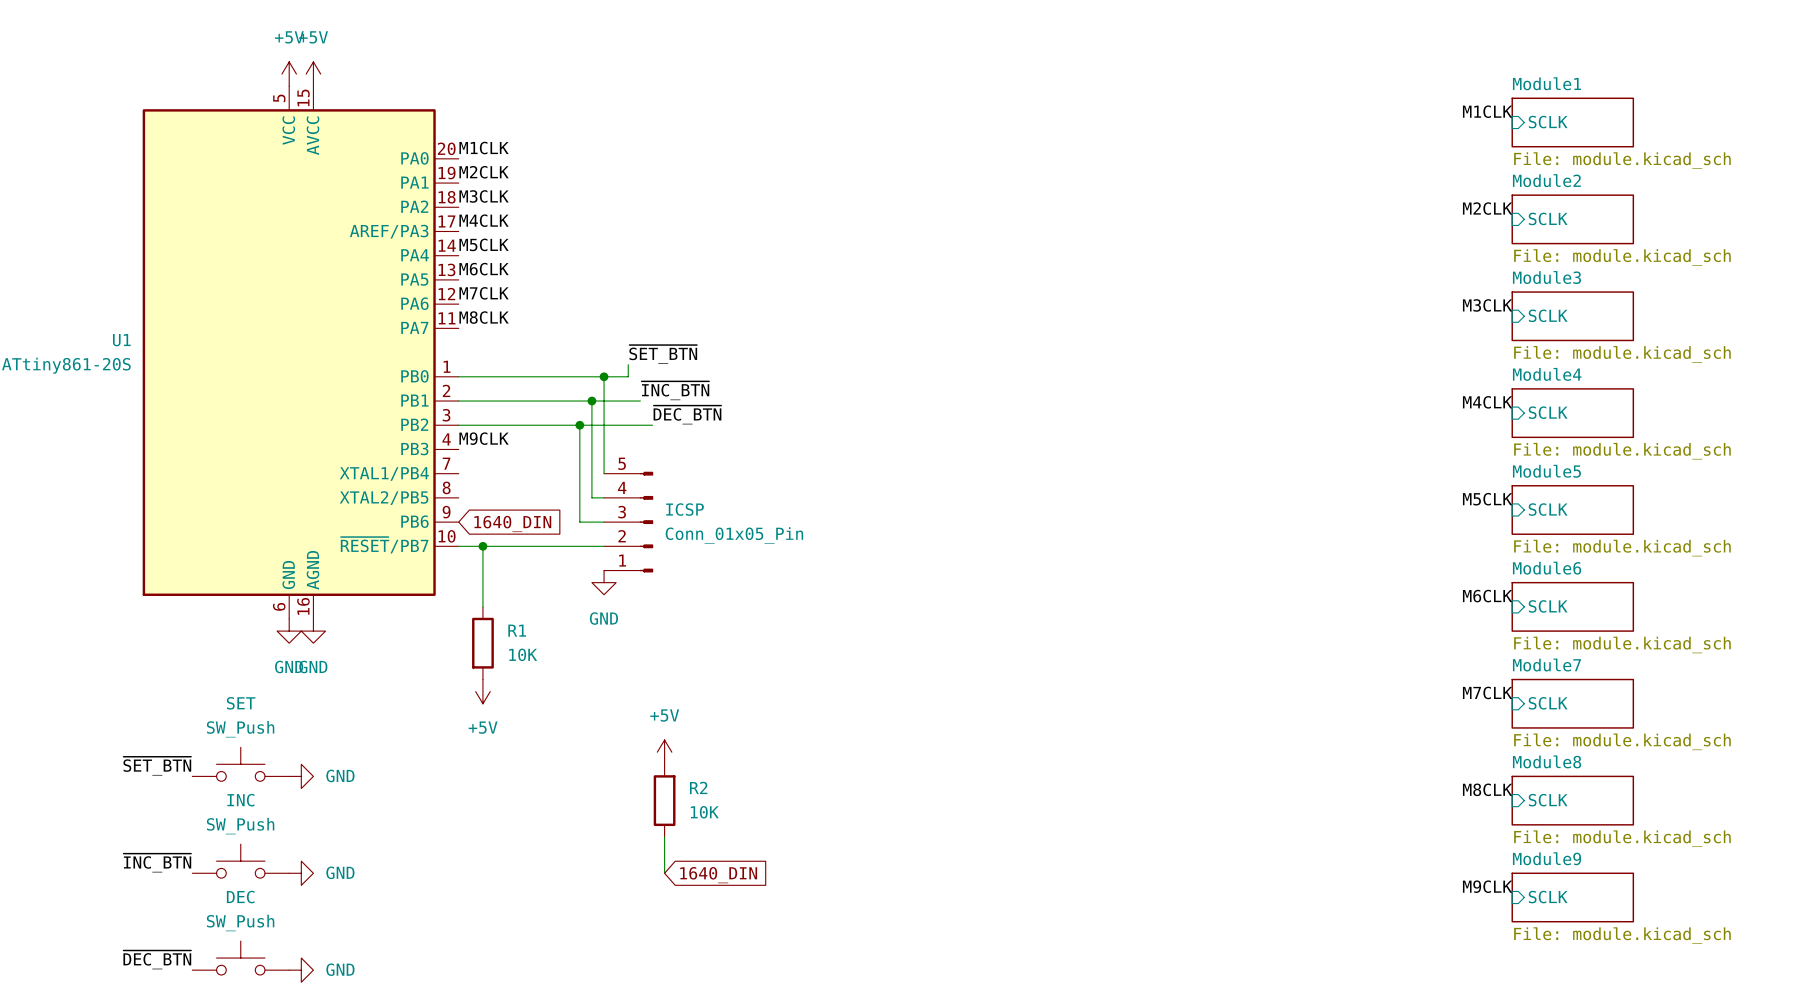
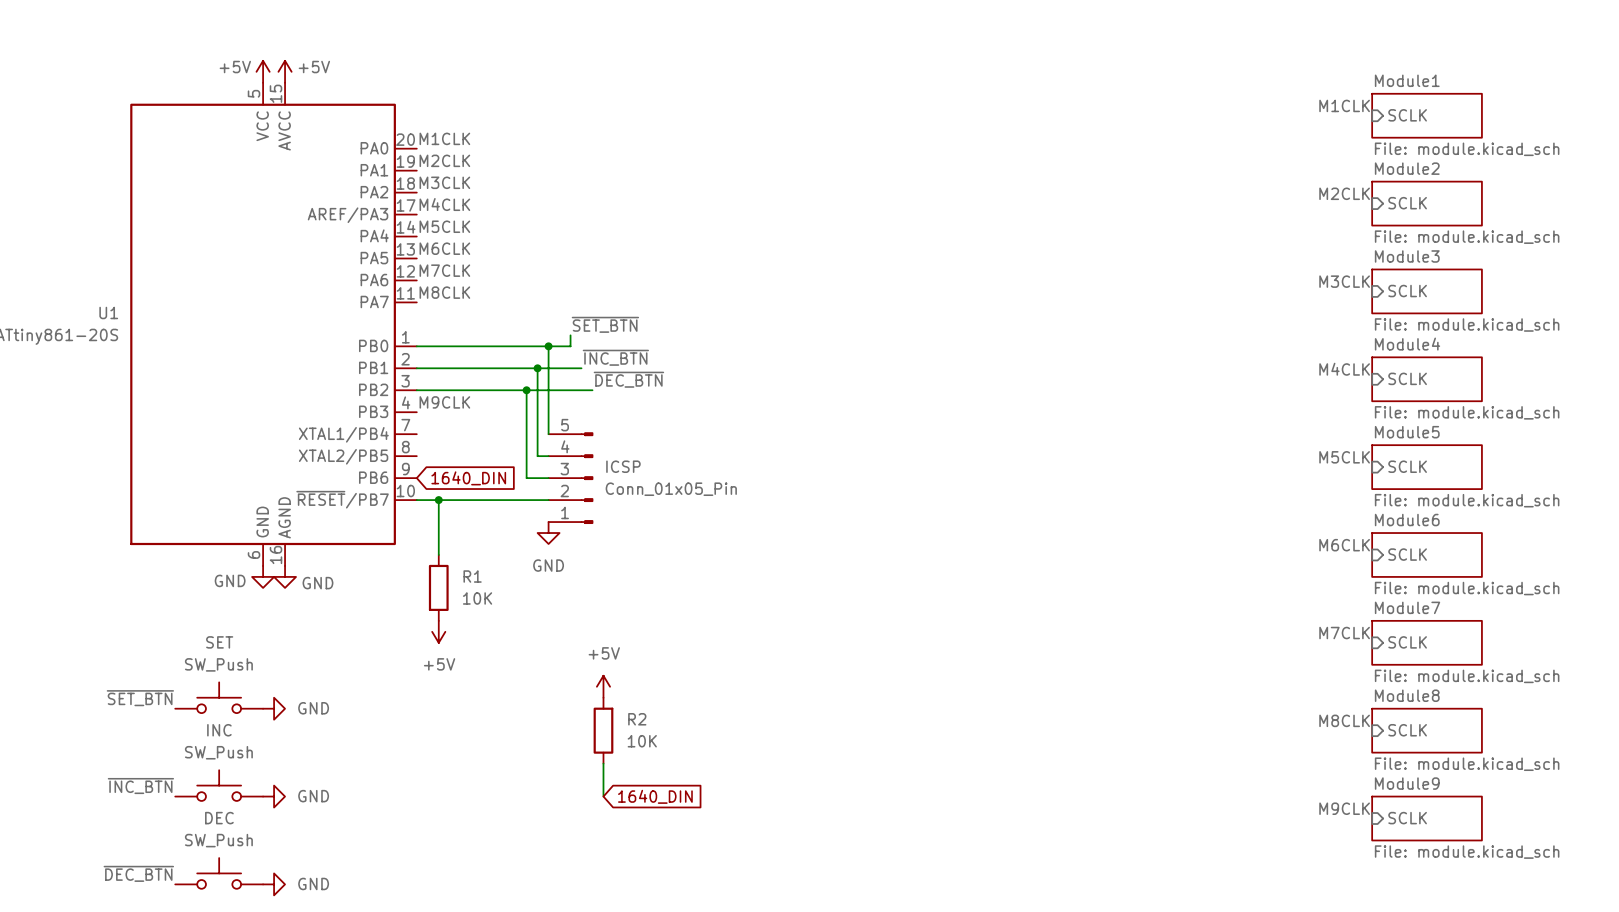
power symbol text position: +5V (289, 37) -> +5V (235, 67)
power symbol text position: +5V (313, 37) -> +5V (314, 67)
power symbol text position: GND (289, 666) -> GND (230, 580)
power symbol text position: GND (313, 666) -> GND (317, 583)

